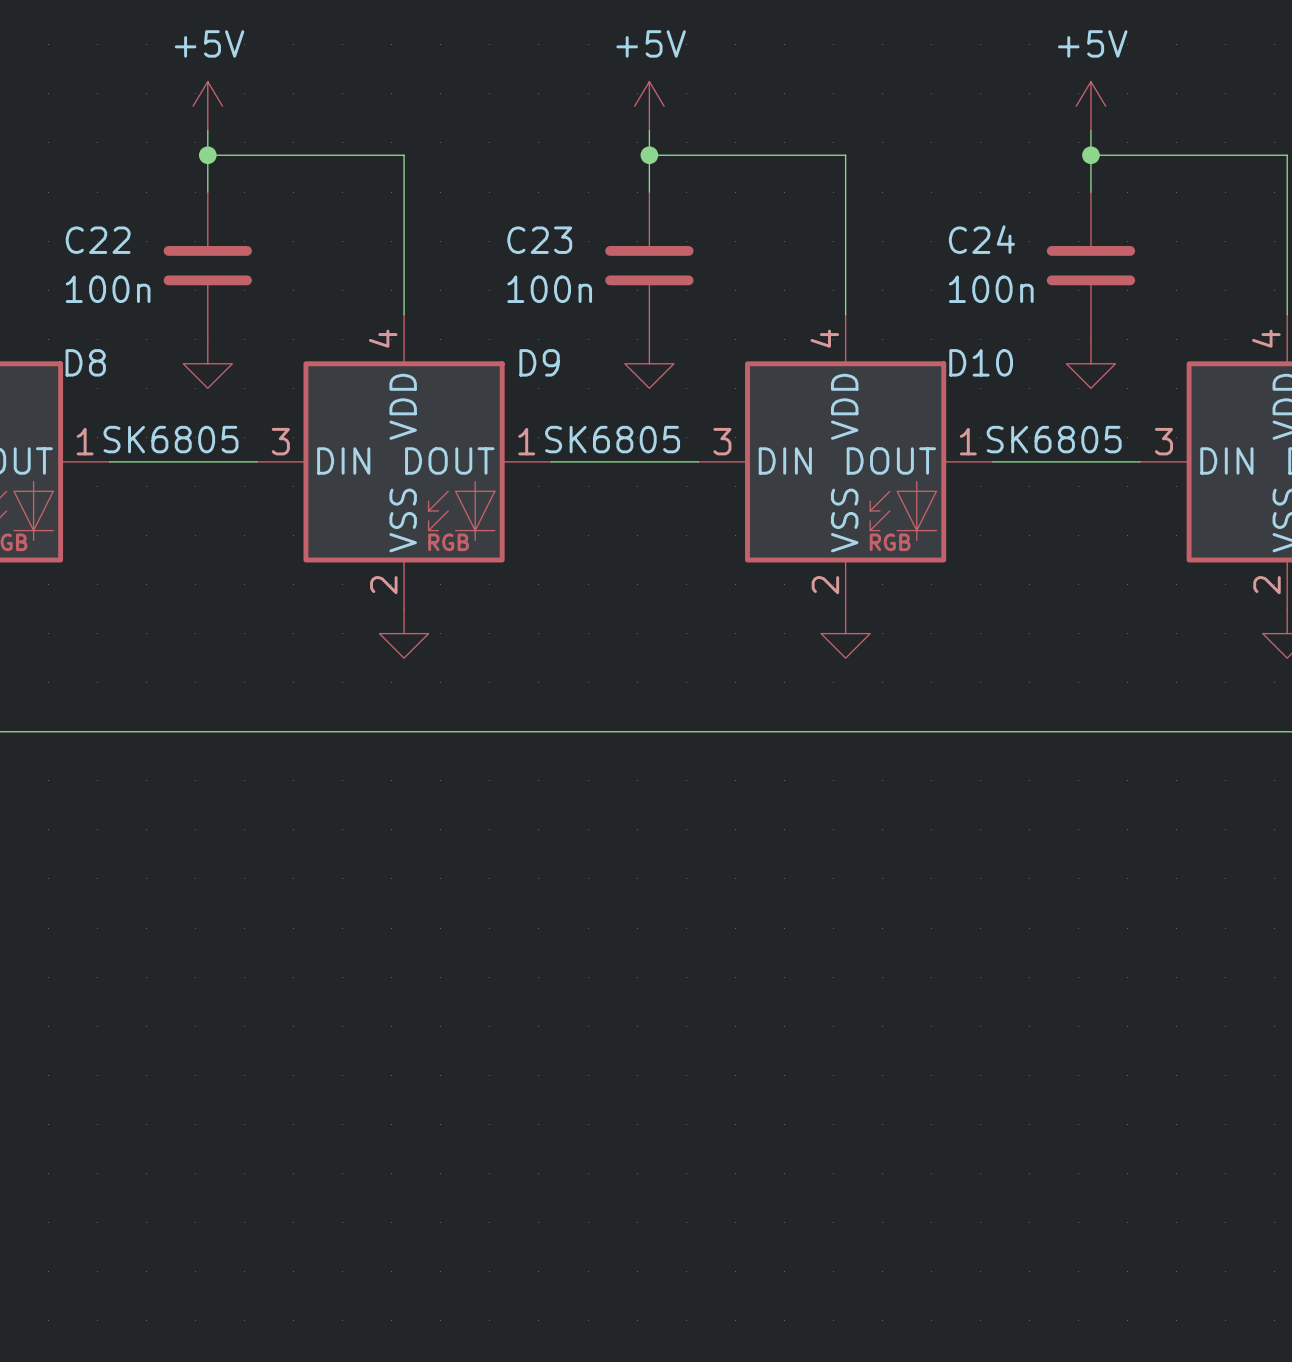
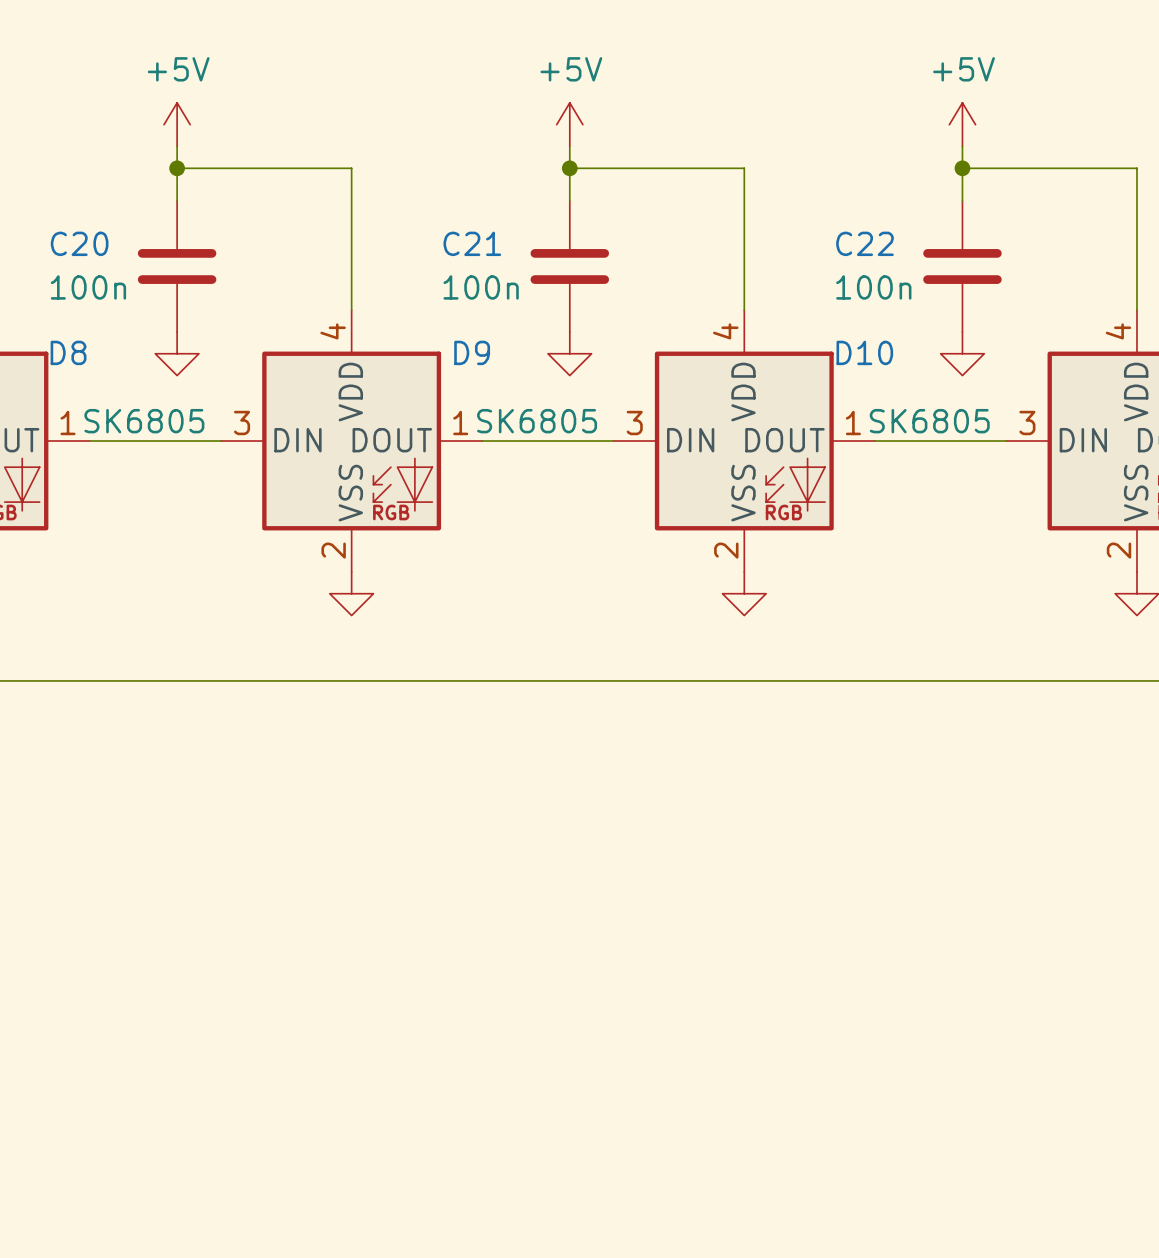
C24 name: C24 (981, 239) -> C22 (864, 243)
C22 name: C22 (98, 240) -> C20 (79, 243)
C23 name: C23 (539, 240) -> C21 (472, 243)

